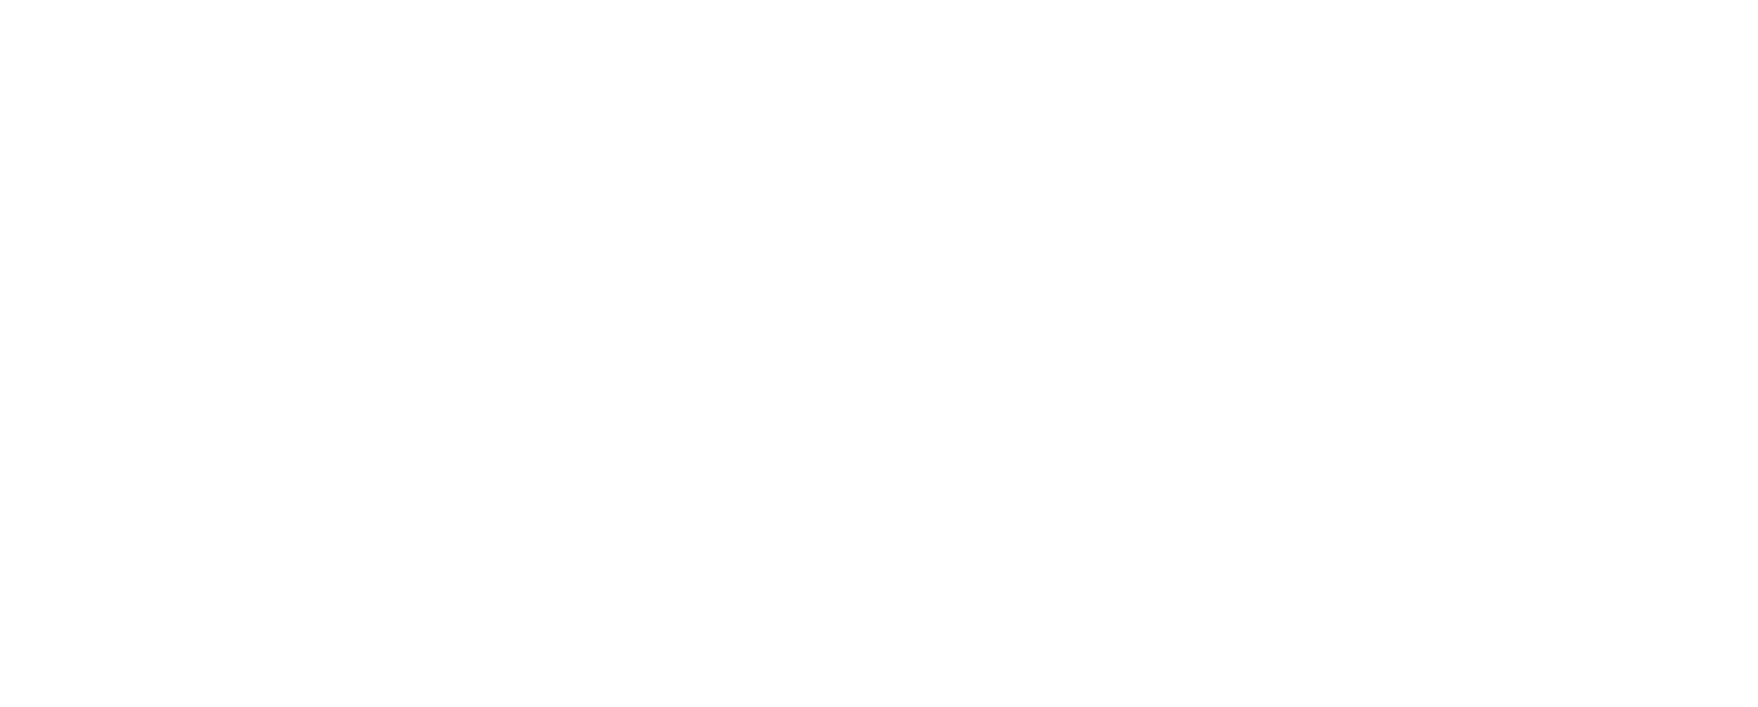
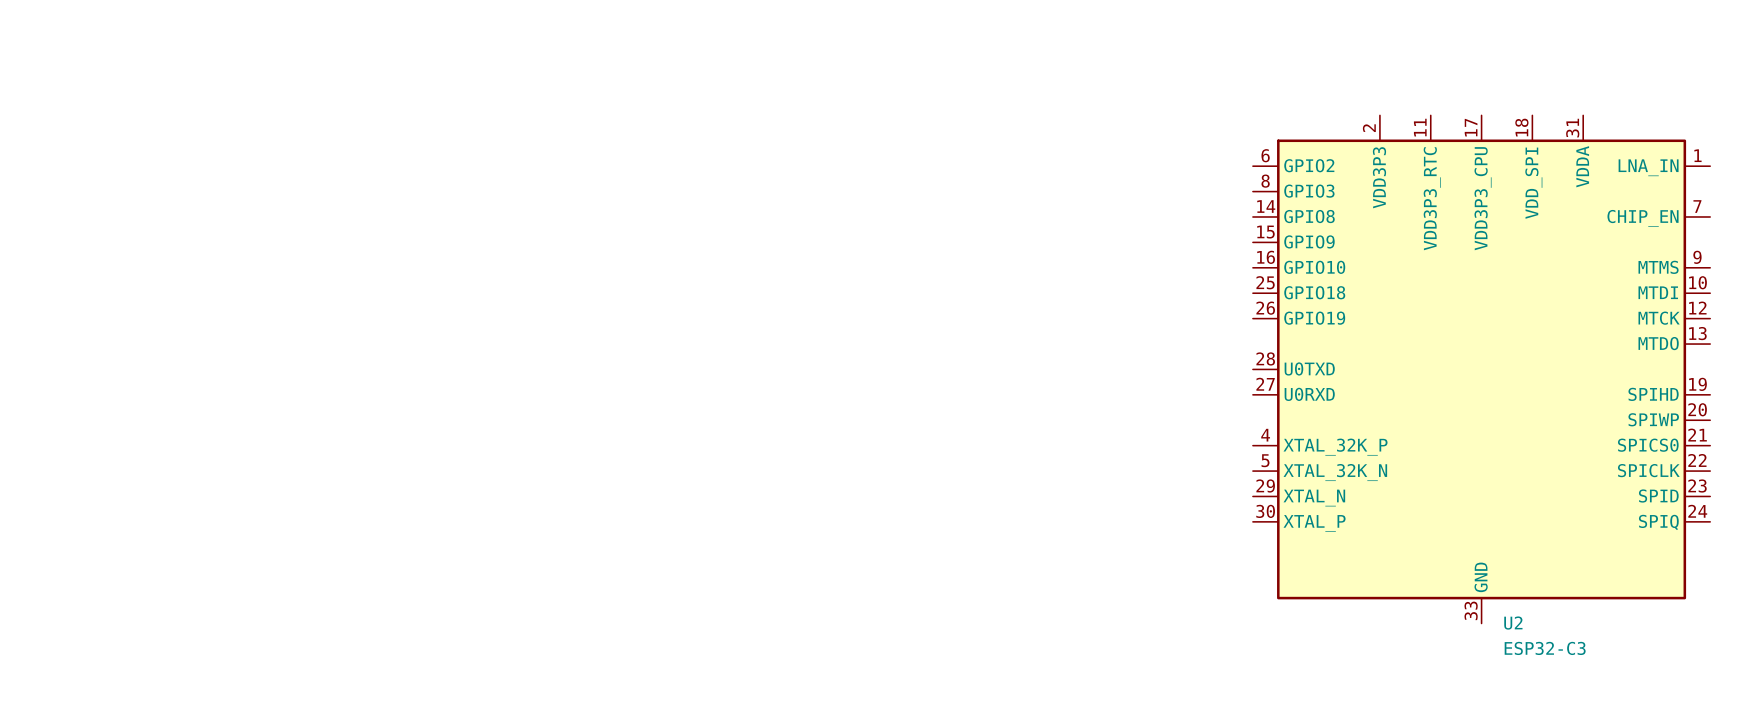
U2: none -> ESP32-C3 (1481, 369)

